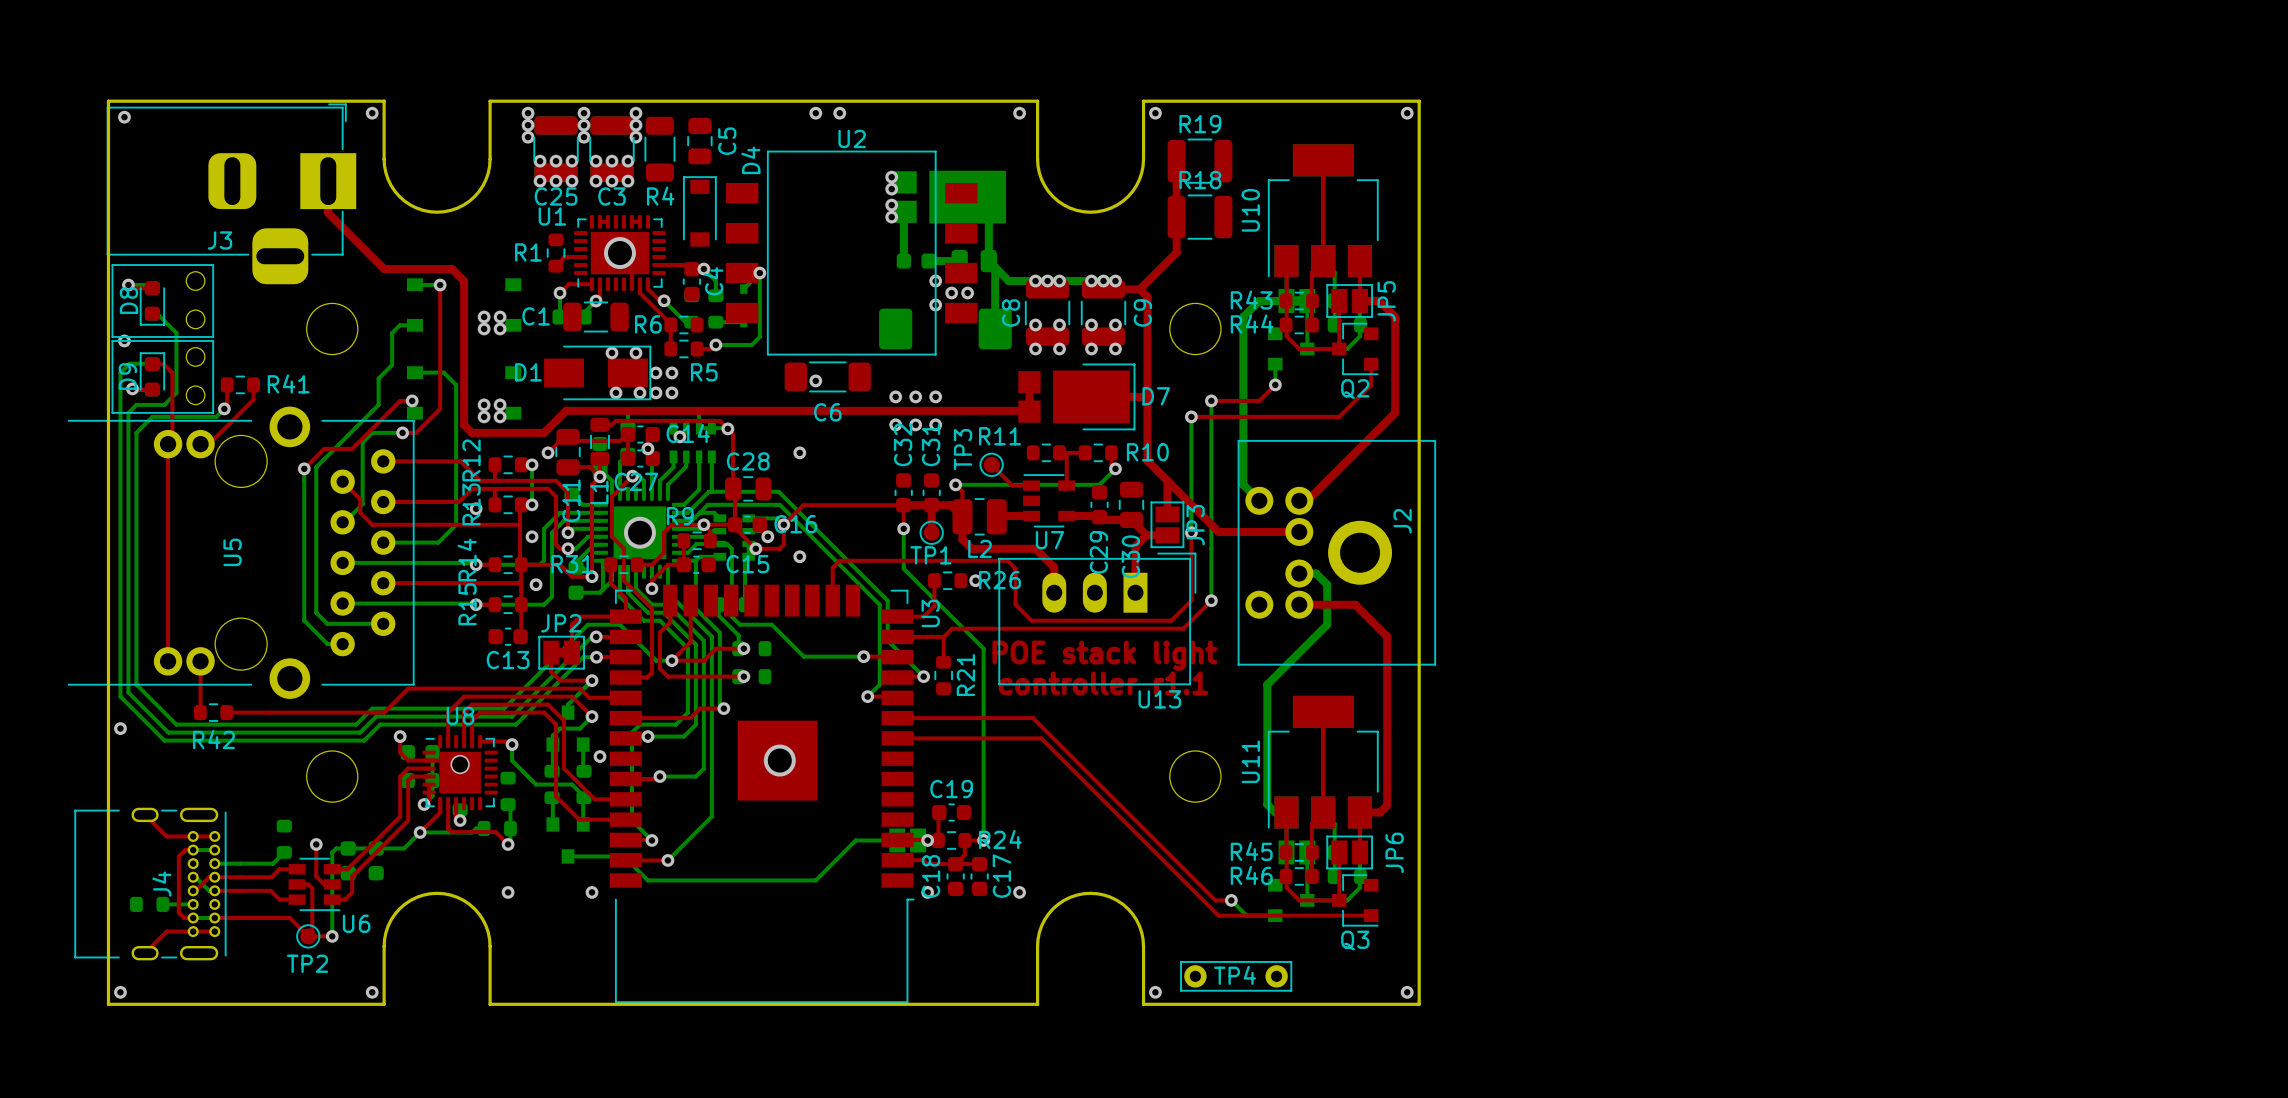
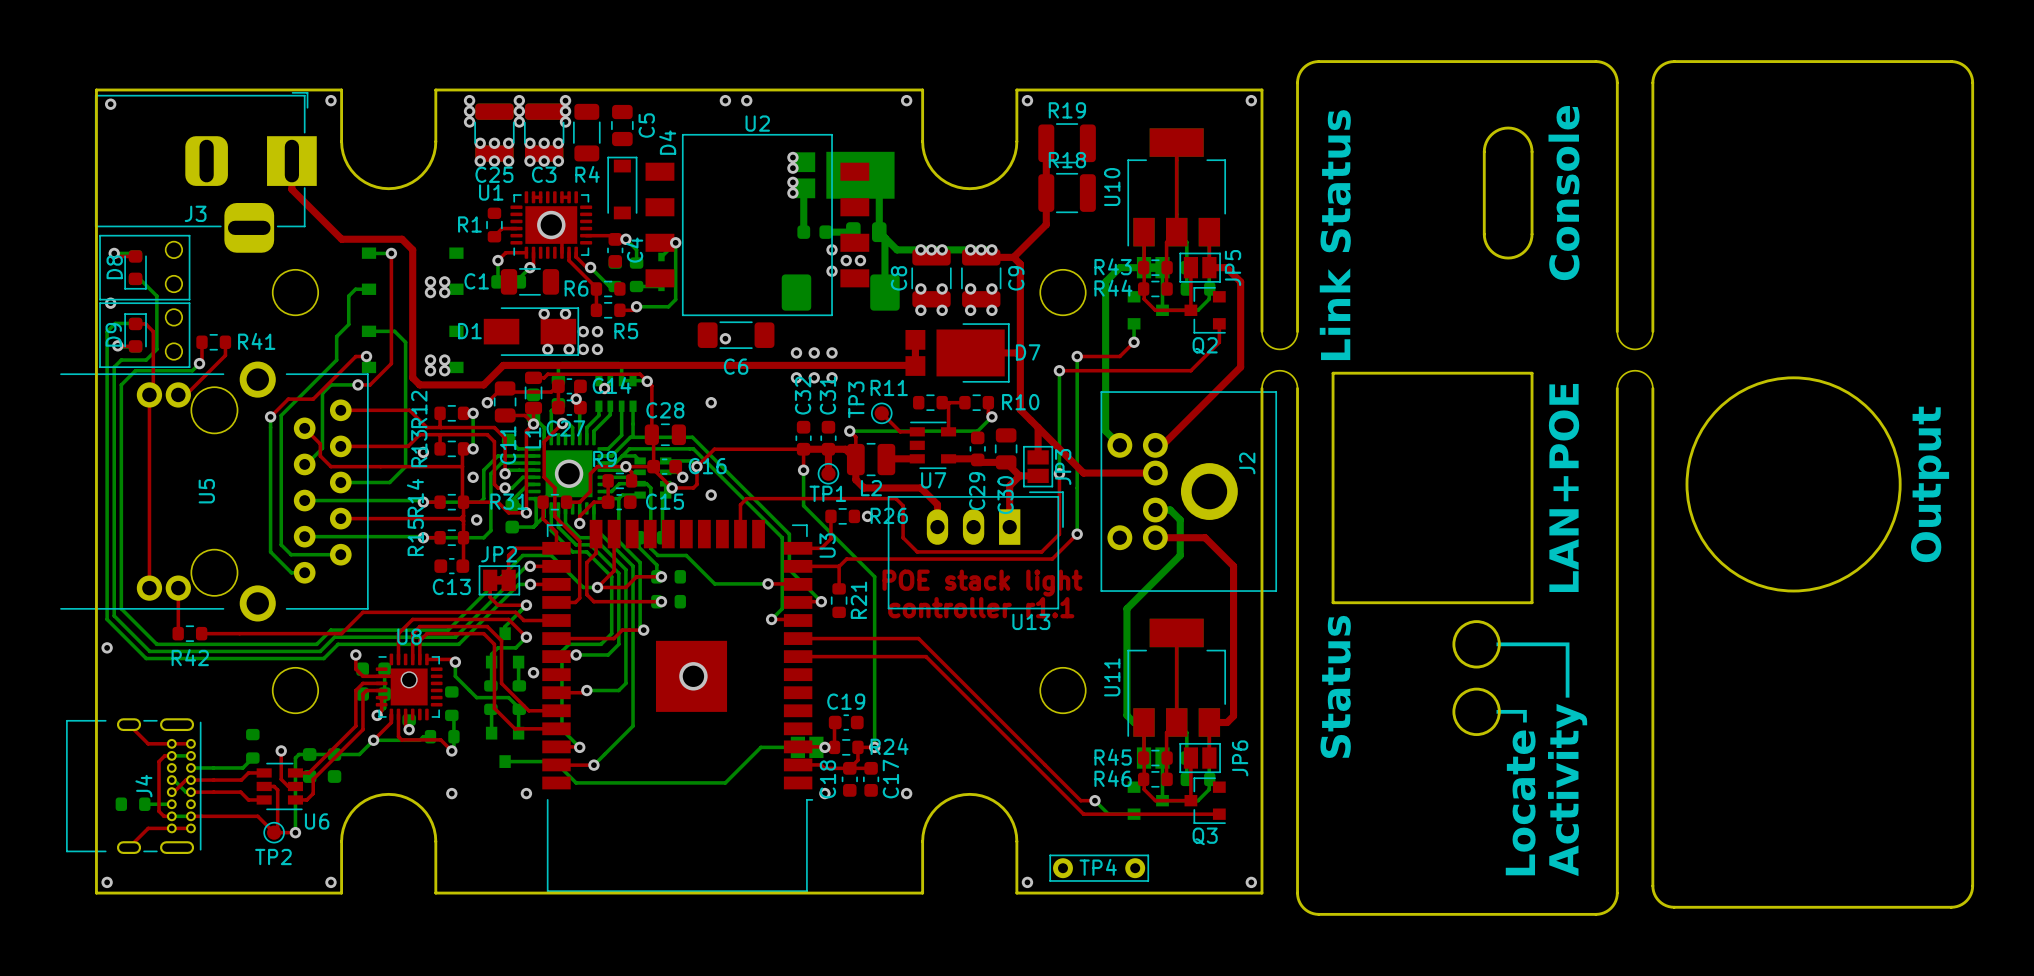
drawing: none -> [1319, 105, 1588, 877]
board edge: none -> (1484, 151) (1485, 240) (1489, 248) (1496, 254) (1505, 257) (1514, 257) (1525, 251) (1531, 237) (1531, 145) (1522, 132) (1514, 128) (1505, 128) (1491, 135) (1486, 142) (1484, 151)
board edge: (1419, 372) (1419, 436) -> (1261, 331) (1265, 342) (1277, 349) (1290, 345) (1297, 333) (1297, 82) (1301, 69) (1310, 63) (1318, 61) (1596, 61) (1604, 63) (1611, 67) (1615, 74) (1617, 82) (1617, 333) (1622, 344) (1635, 349) (1647, 344) (1652, 333) (1652, 82) (1654, 74) (1661, 65) (1674, 61) (1951, 61) (1964, 65) (1971, 74) (1972, 82) (1972, 885) (1968, 898) (1959, 905) (1951, 907) (1674, 907) (1663, 904) (1655, 896) (1652, 885) (1652, 388) (1647, 375) (1635, 370) (1622, 375) (1617, 388) (1617, 893) (1614, 903) (1606, 911) (1596, 914) (1318, 914) (1305, 909) (1299, 901) (1297, 893) (1297, 386) (1290, 374) (1277, 370) (1267, 375) (1261, 388)
board edge: none -> (1333, 373) (1333, 602) (1532, 602) (1532, 373) (1333, 373)
round board edge: none -> [1685, 376, 1902, 593]
drawing: none -> [1910, 406, 1950, 563]
round board edge: none -> [1452, 620, 1501, 669]
round board edge: none -> [1452, 687, 1501, 737]

